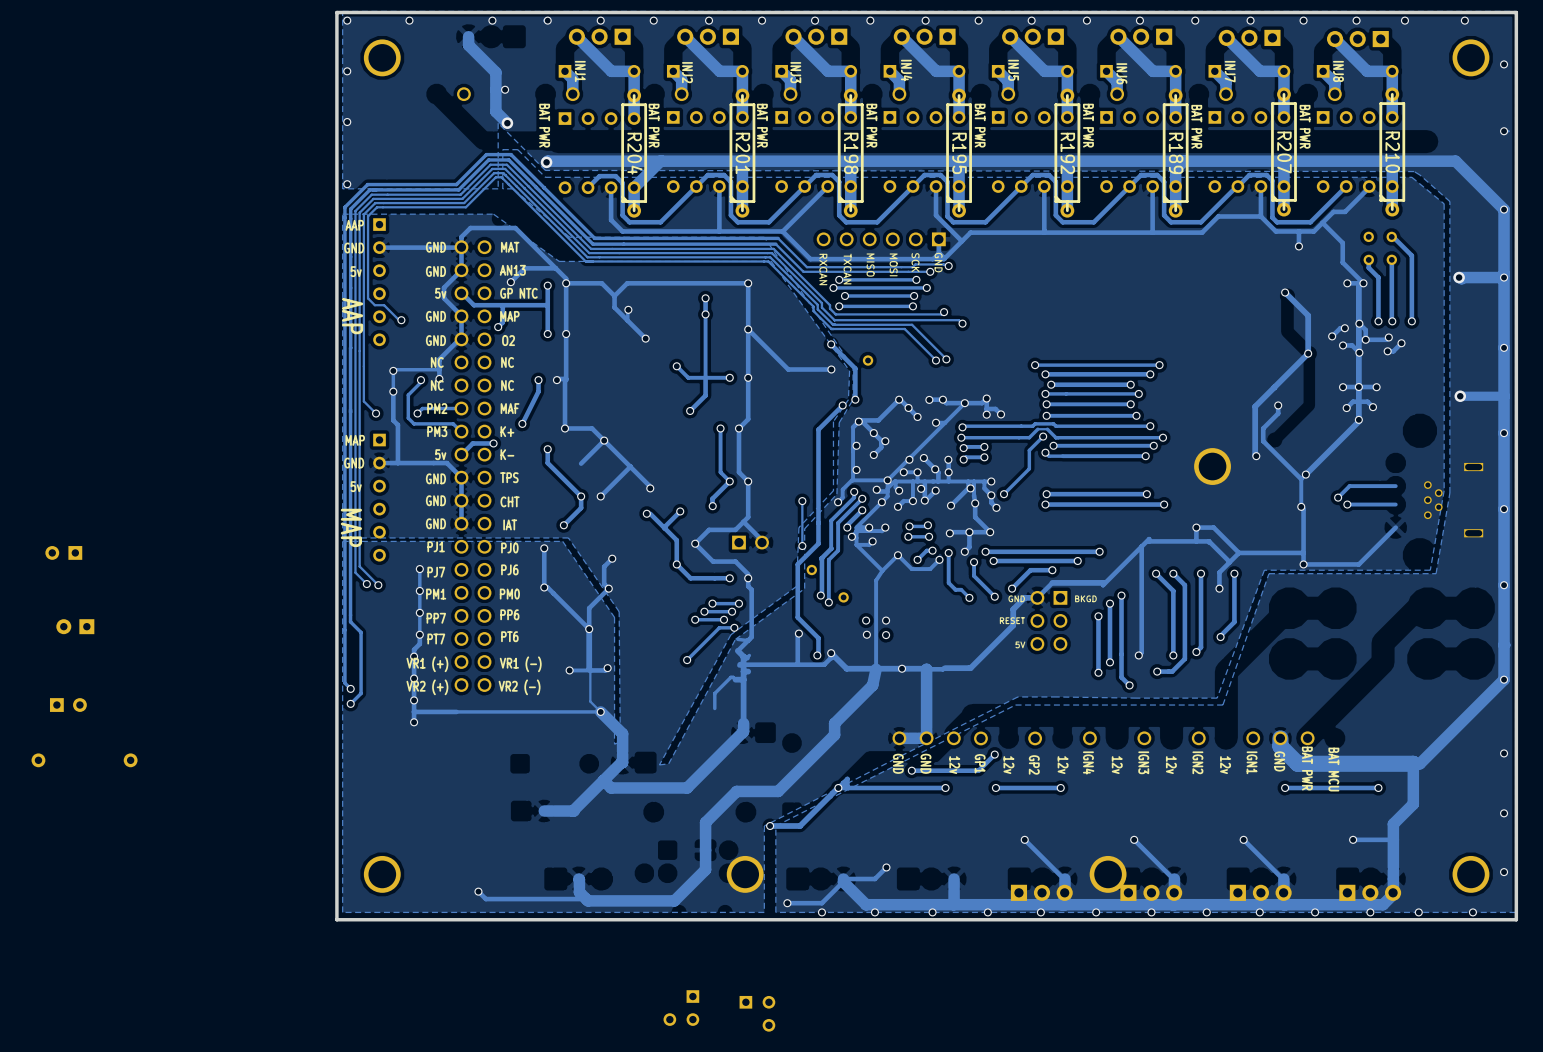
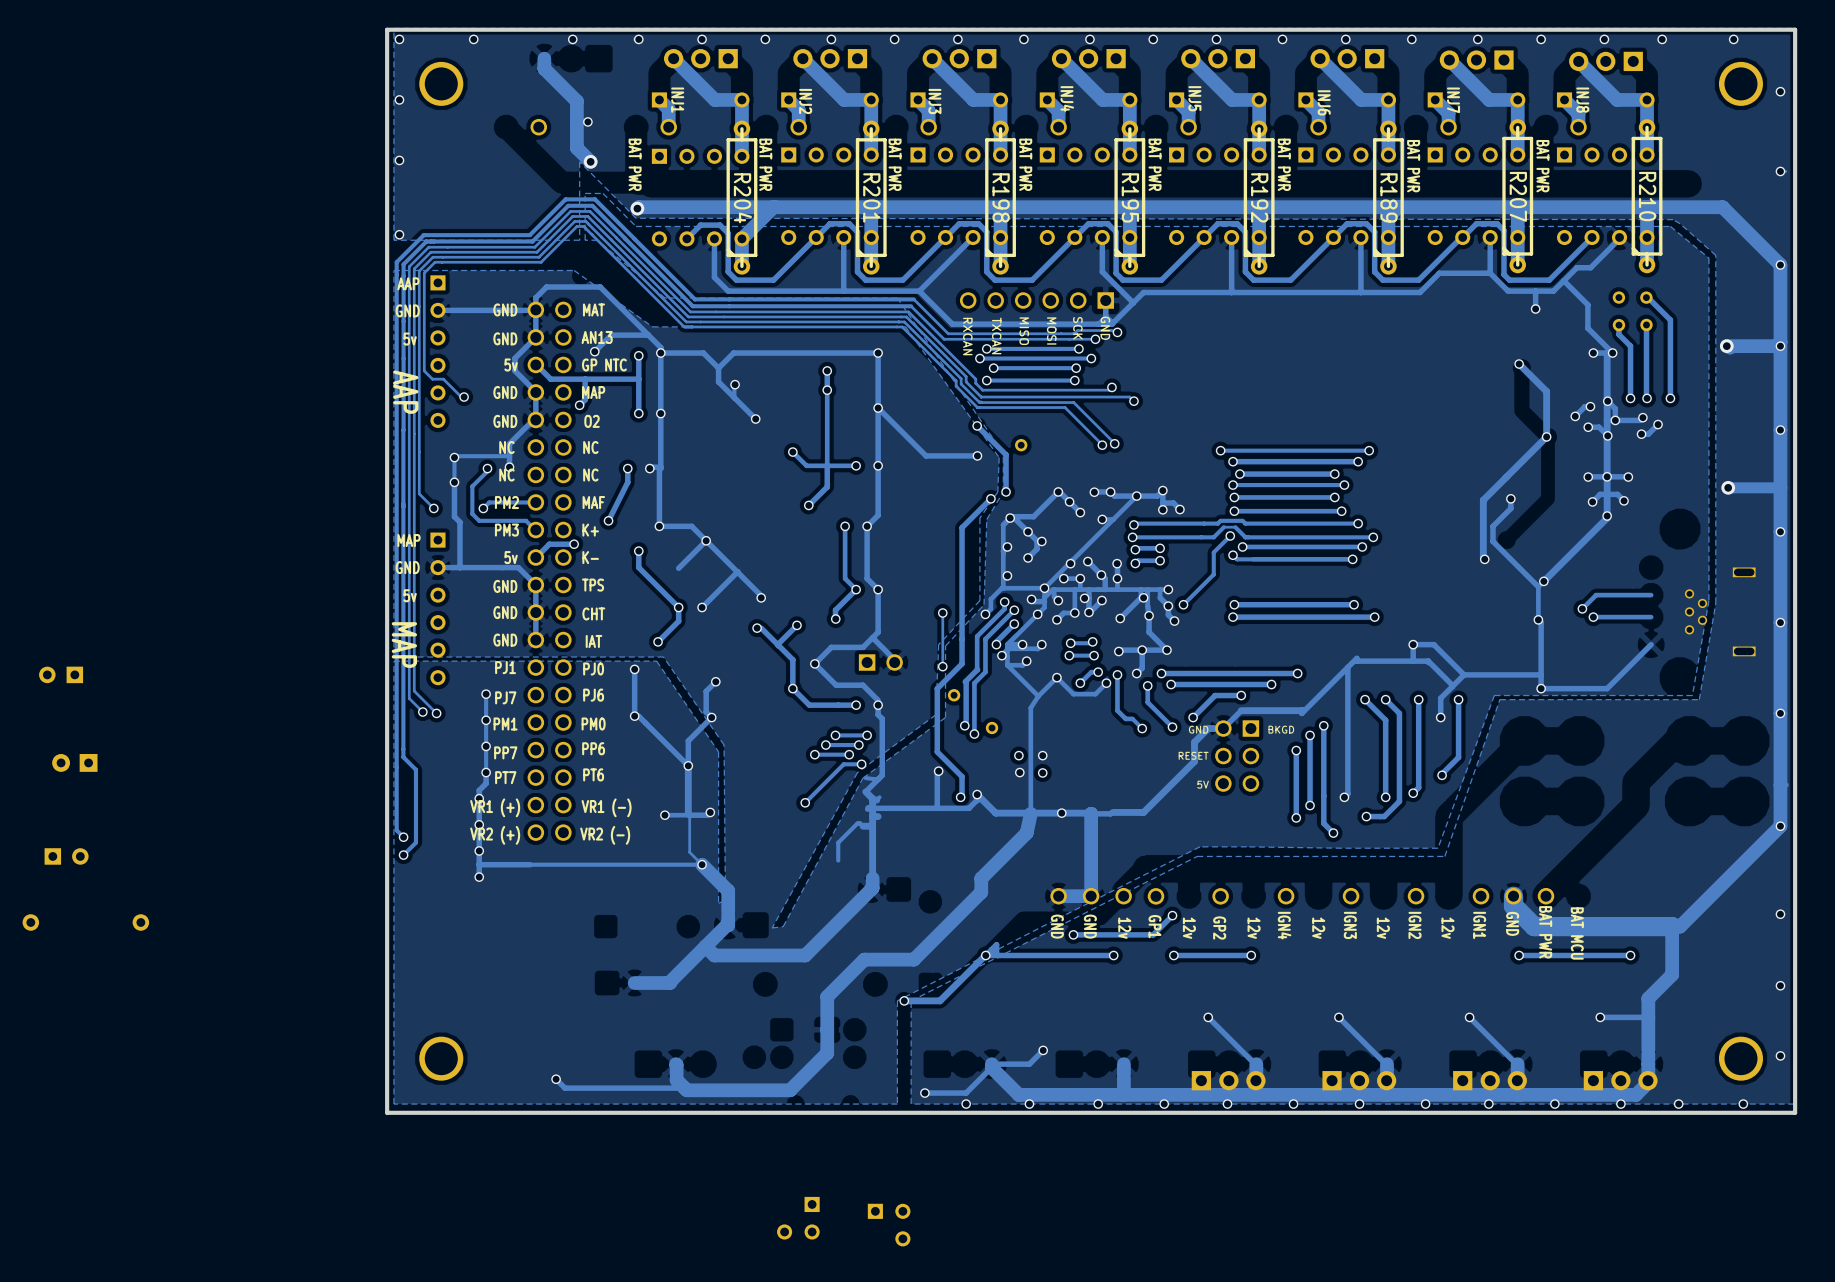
part: (1212, 466) -> none
part: (745, 874) -> none
part: (1108, 874) -> none

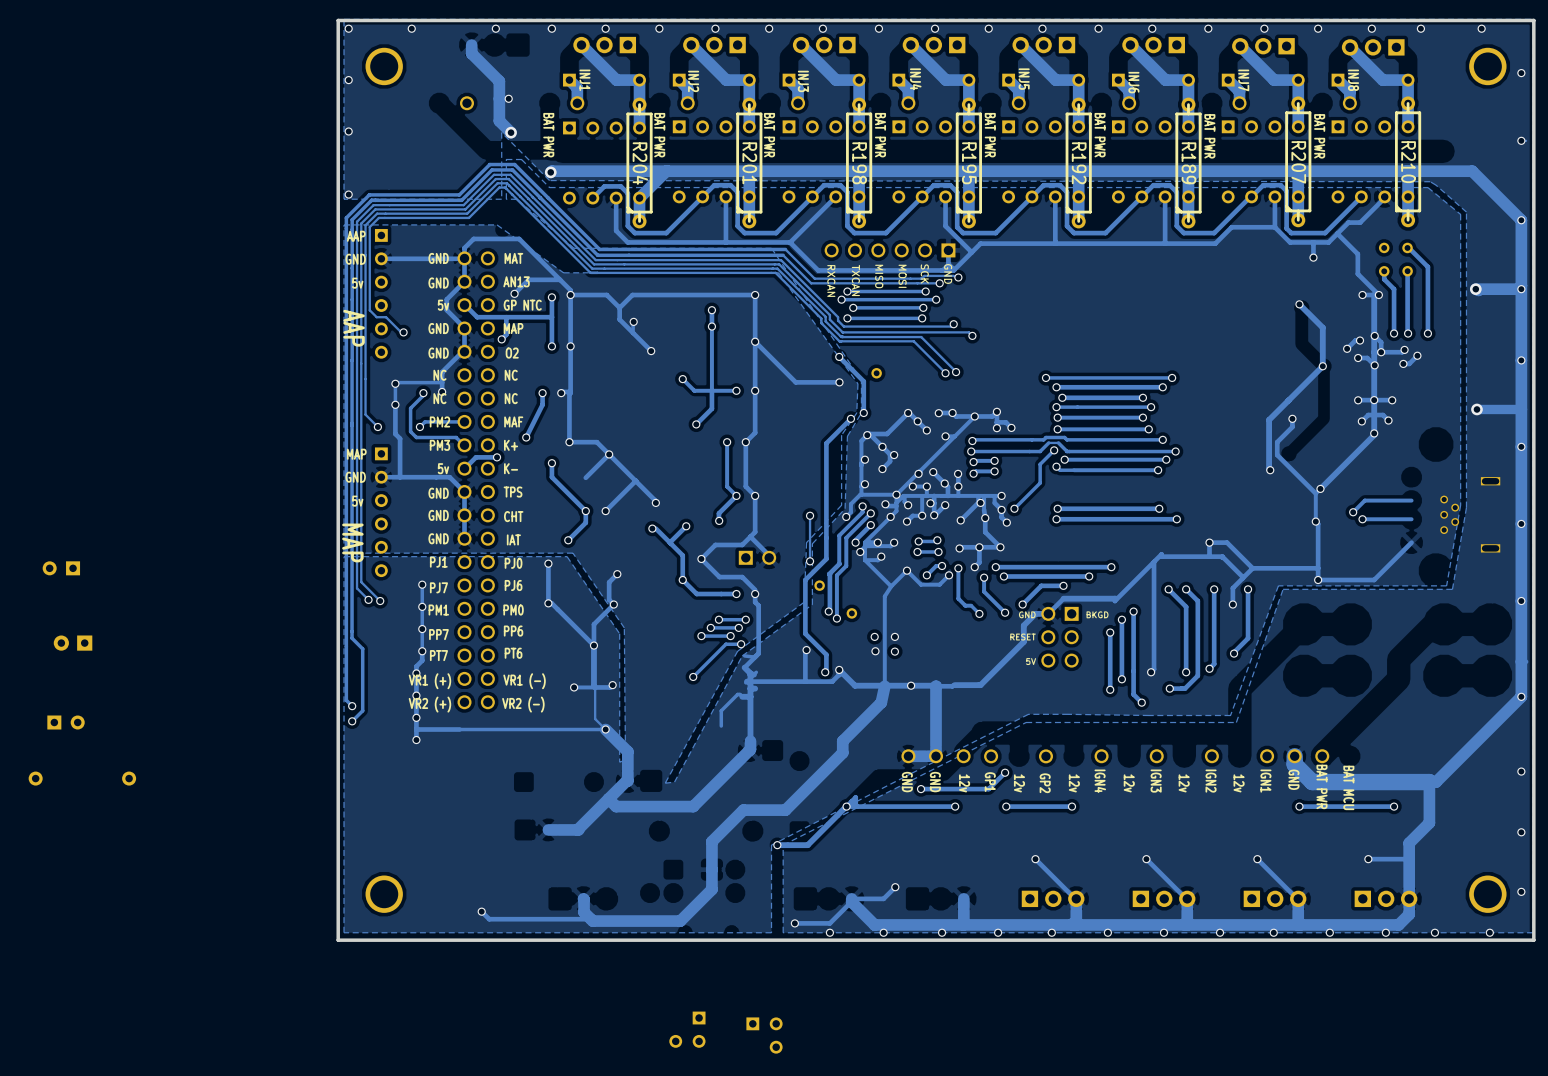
part position: (1228, 1080) -> (1053, 898)
part position: (1359, 1080) -> (1164, 898)
part position: (1490, 1080) -> (1275, 898)
part position: (1620, 1080) -> (1386, 898)

